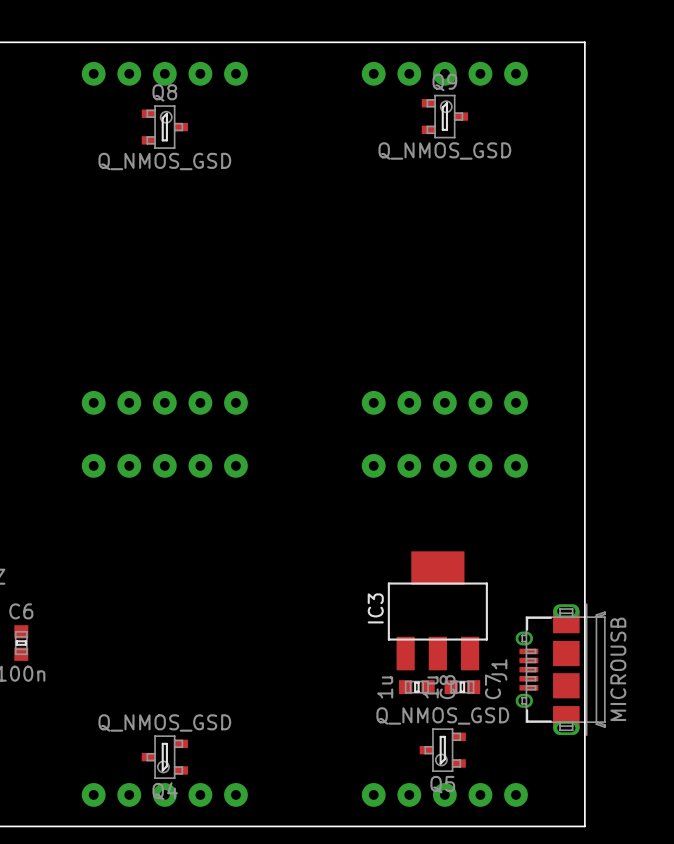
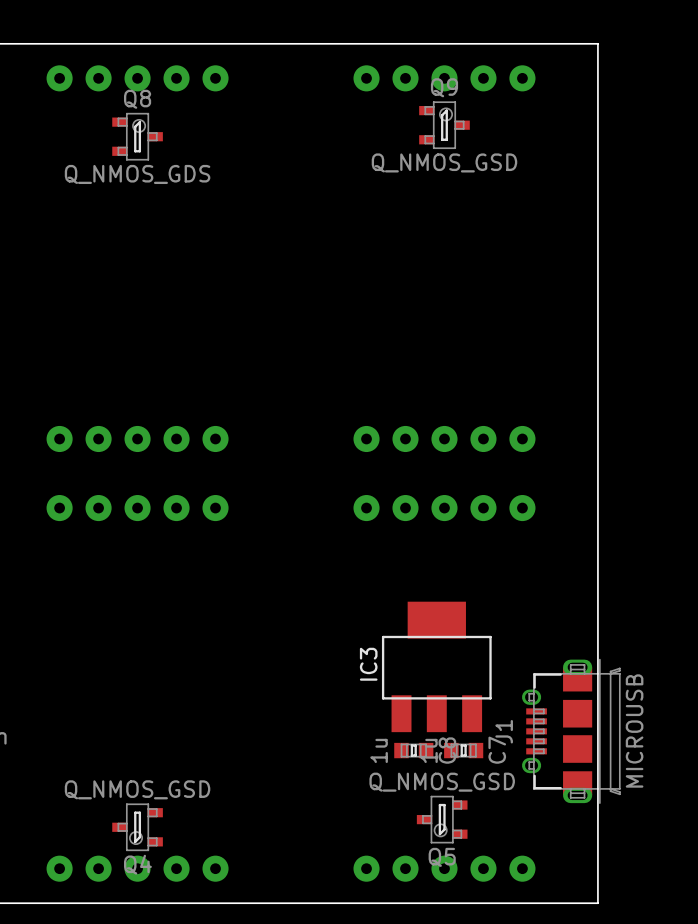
Q8 value: Q_NMOS_GSD (164, 161) -> Q_NMOS_GDS (137, 174)

